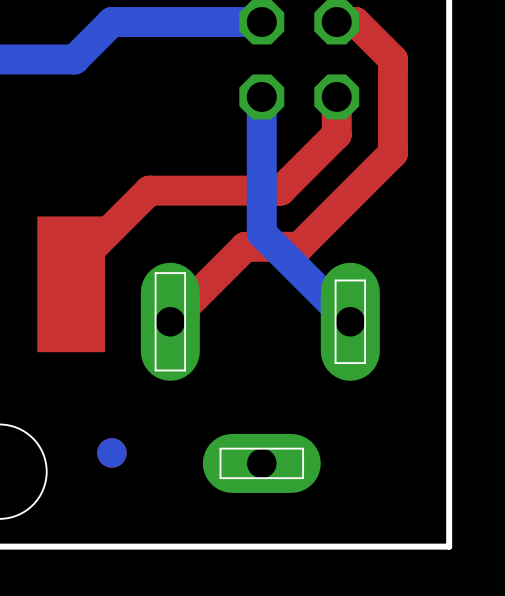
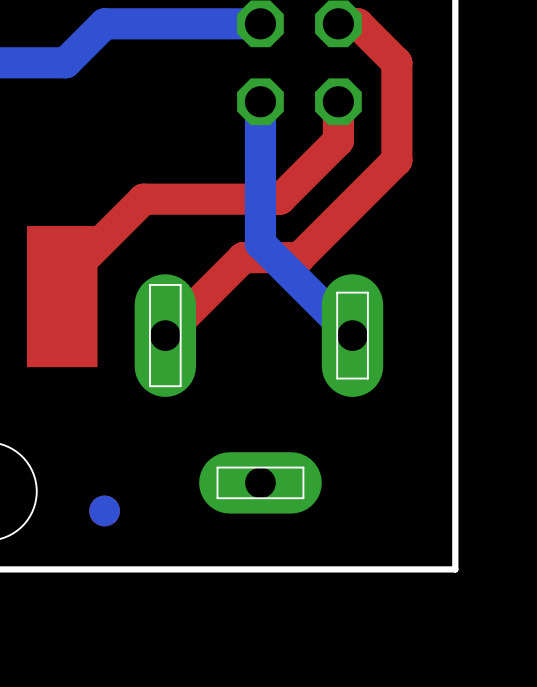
drawing position: (111, 452) -> (104, 510)

